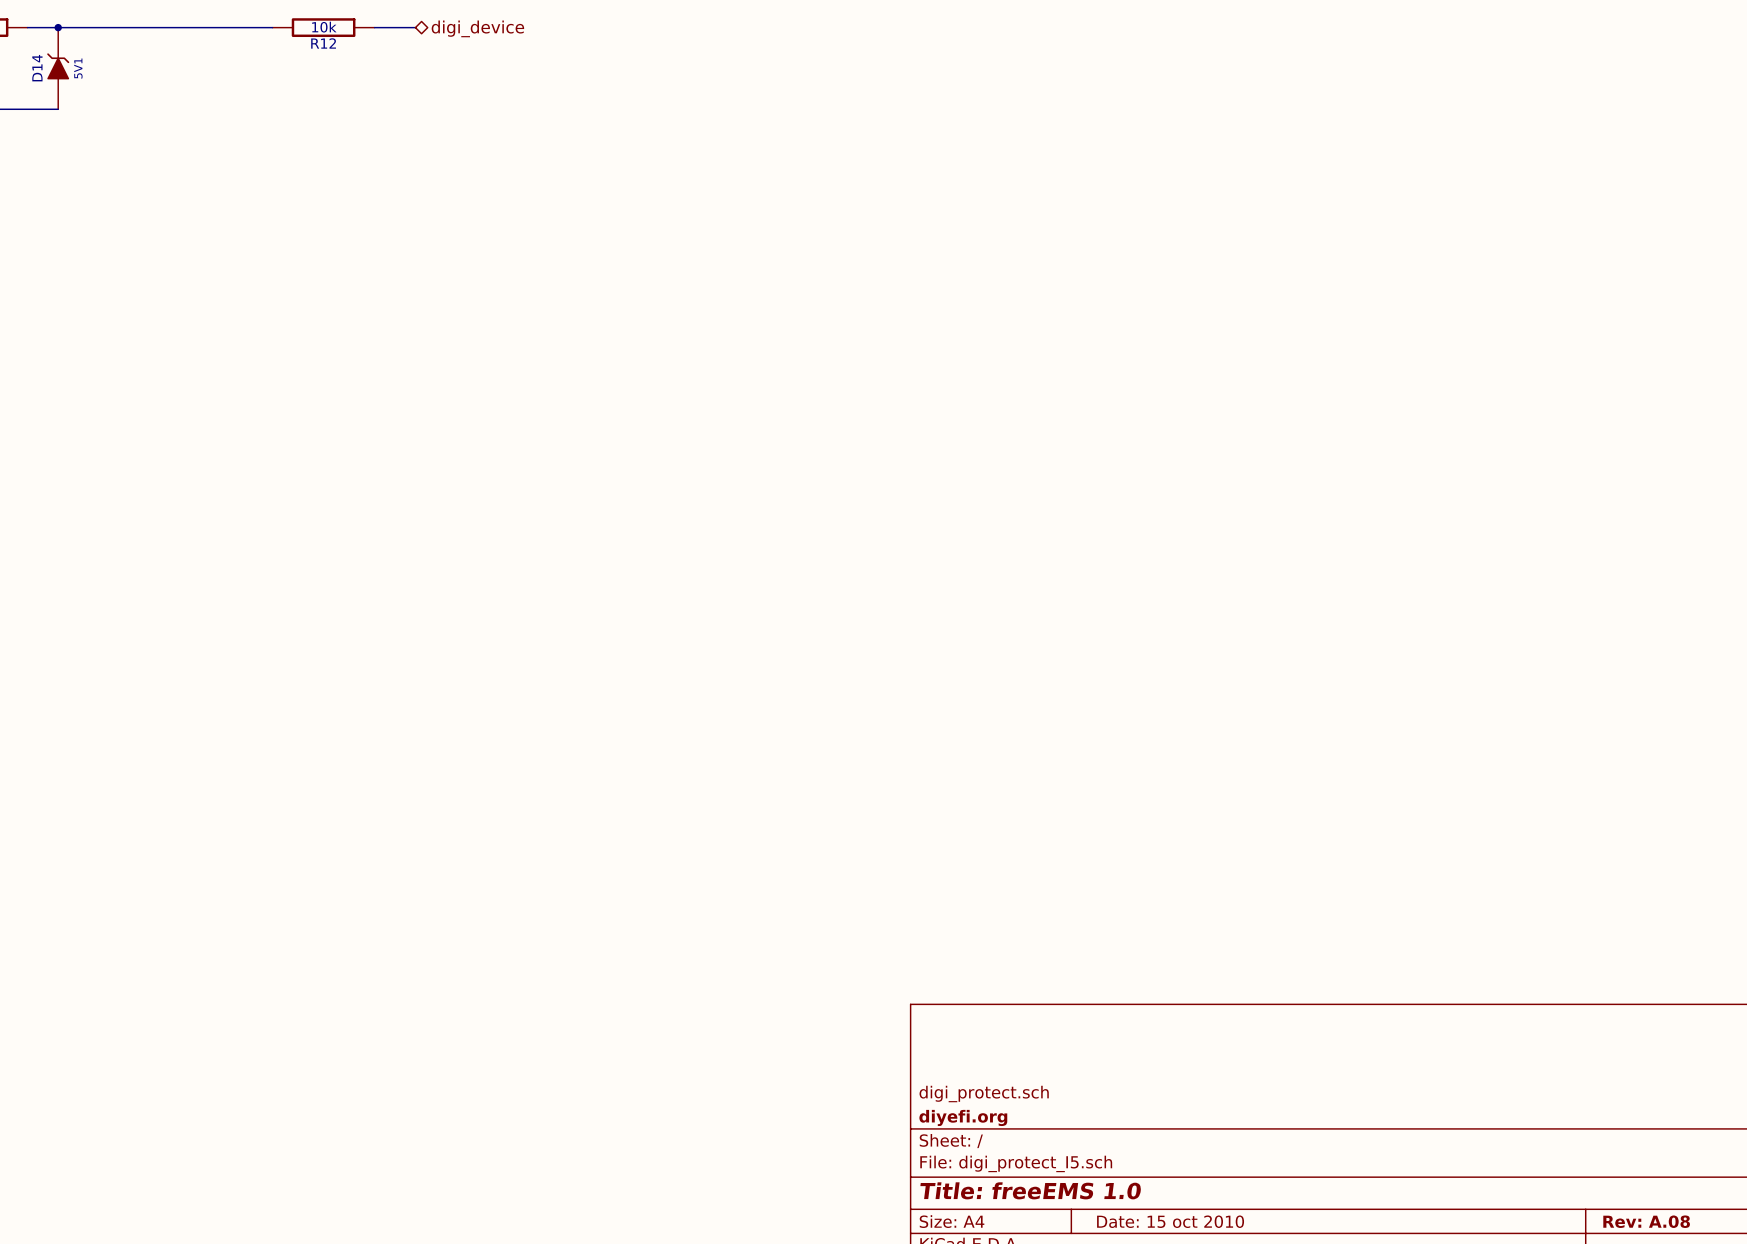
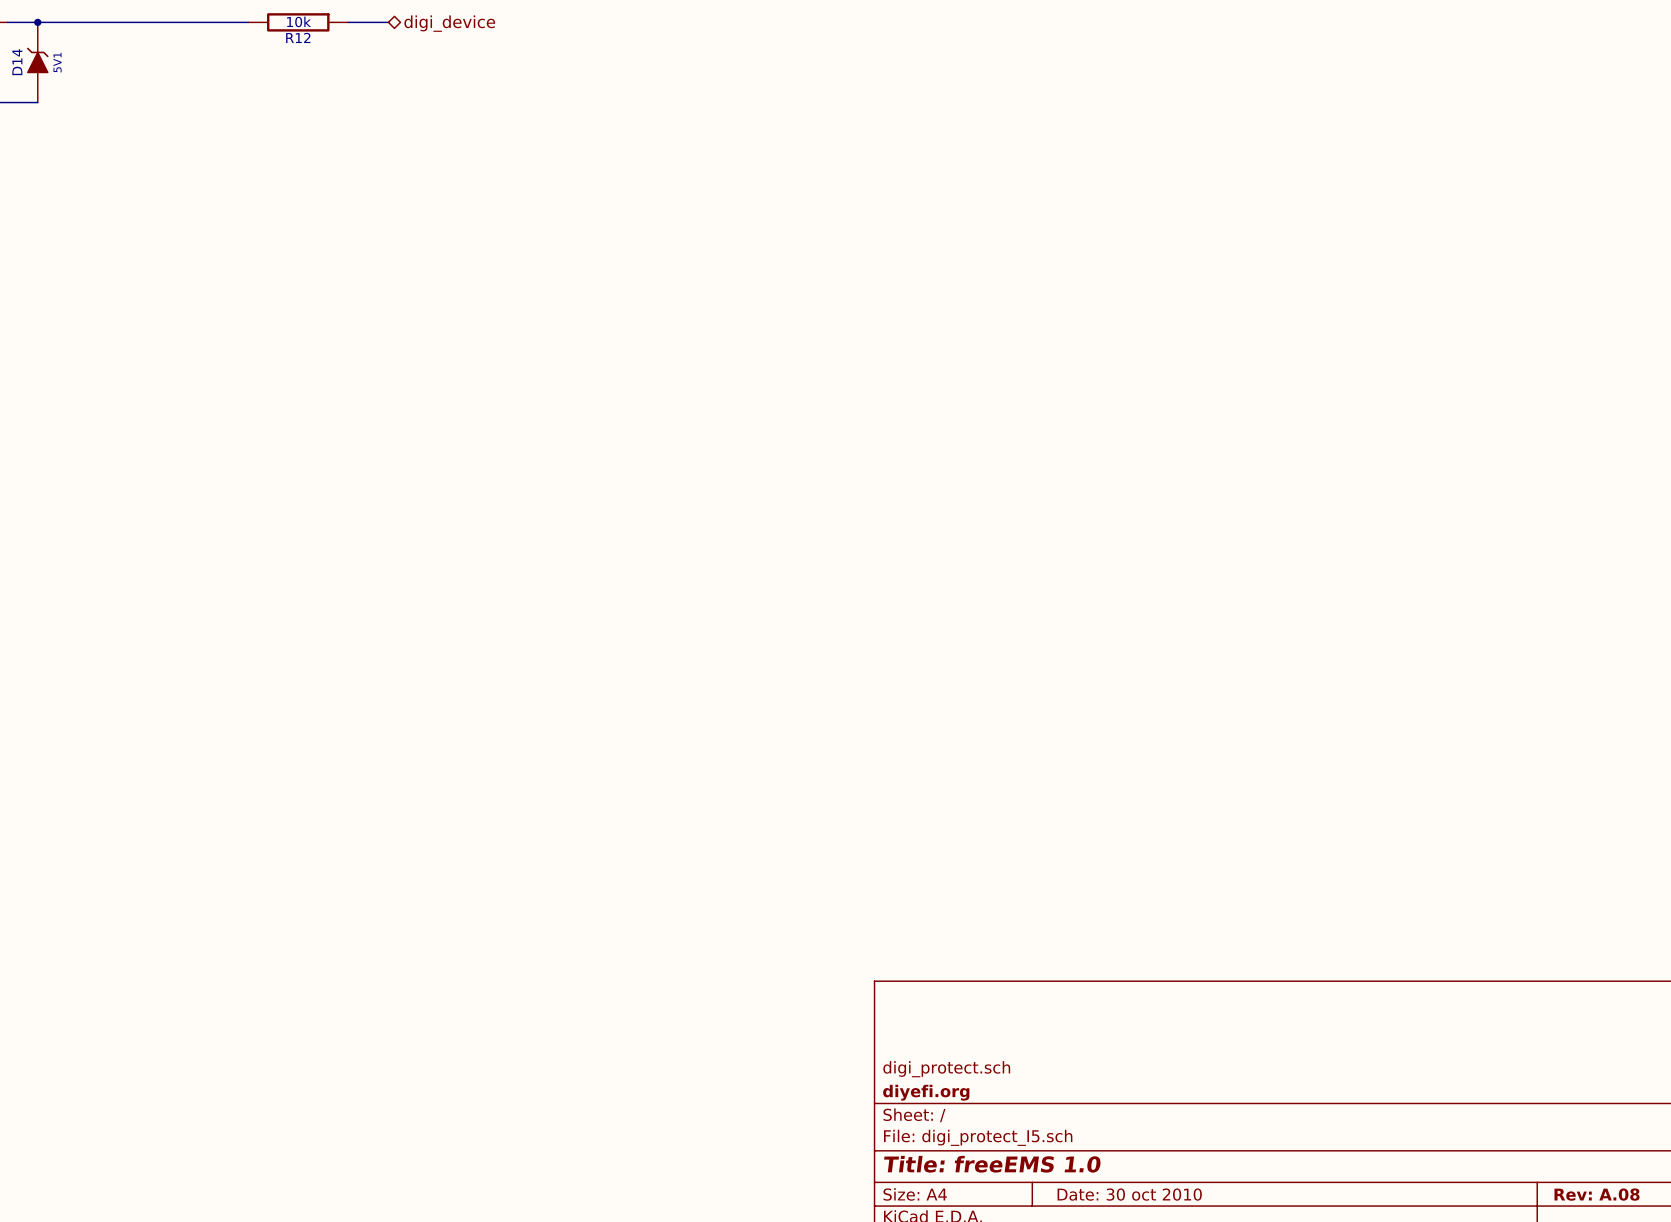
title block: Date: 15 oct 2010 (1170, 1221) -> Date: 30 oct 2010 (1129, 1194)

